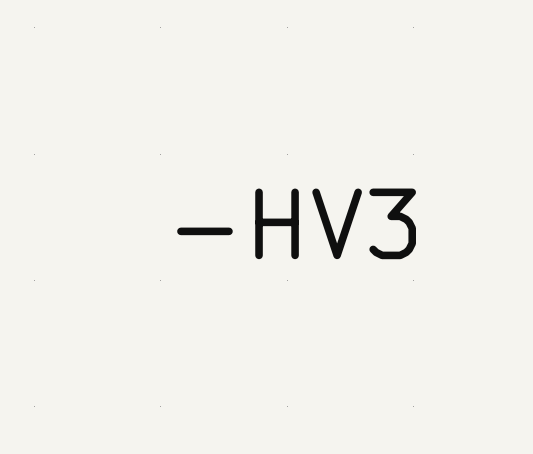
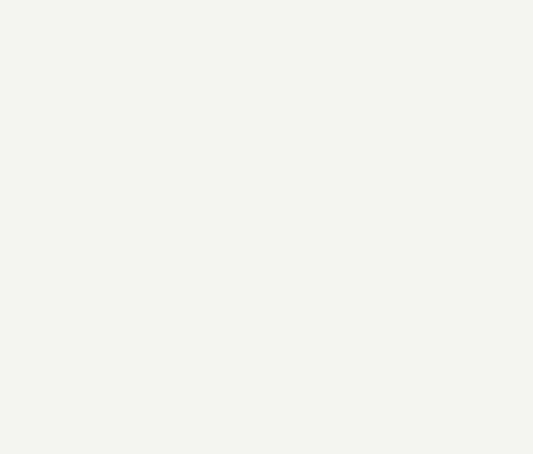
label: -HV3 (296, 223) -> none

